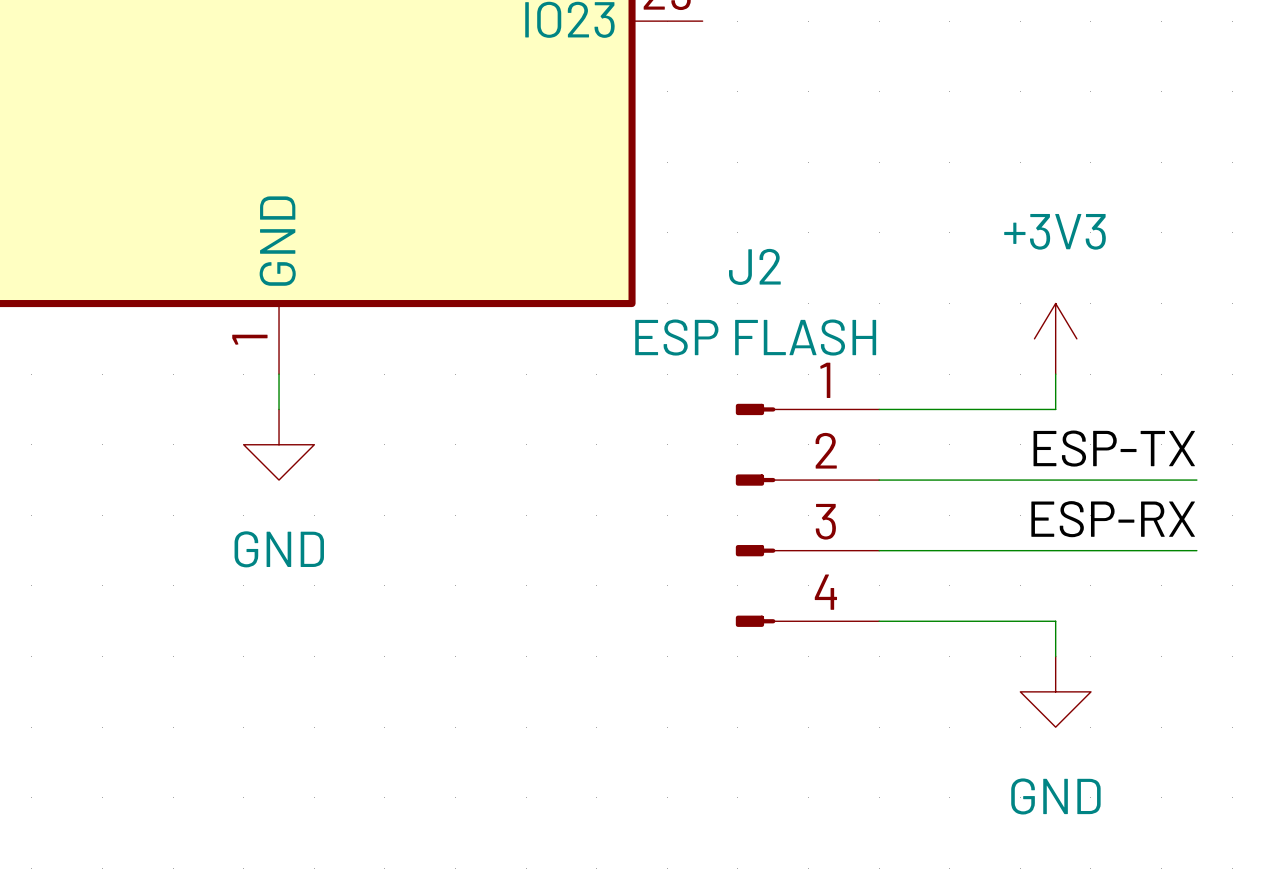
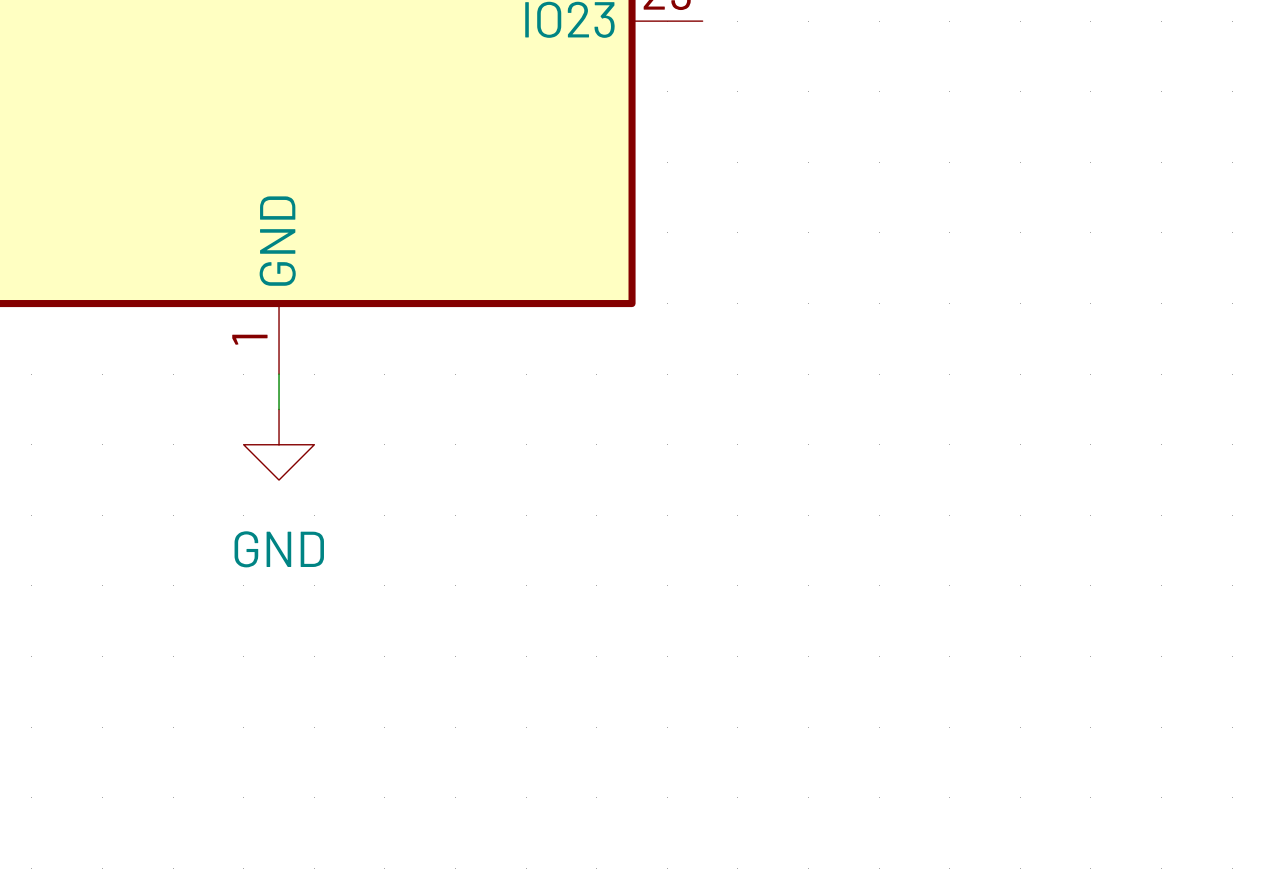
power symbol: +3V3 (1055, 338) -> none
wire: (1055, 374) (1055, 409) (879, 409) -> none
label: ESP-TX (1114, 448) -> none
wire: (879, 480) (1196, 480) -> none
J2: ESP FLASH (807, 515) -> none
label: ESP-RX (1113, 519) -> none
wire: (879, 550) (1196, 550) -> none
wire: (879, 621) (1055, 621) (1055, 656) -> none
power symbol: GND (1055, 691) -> none

